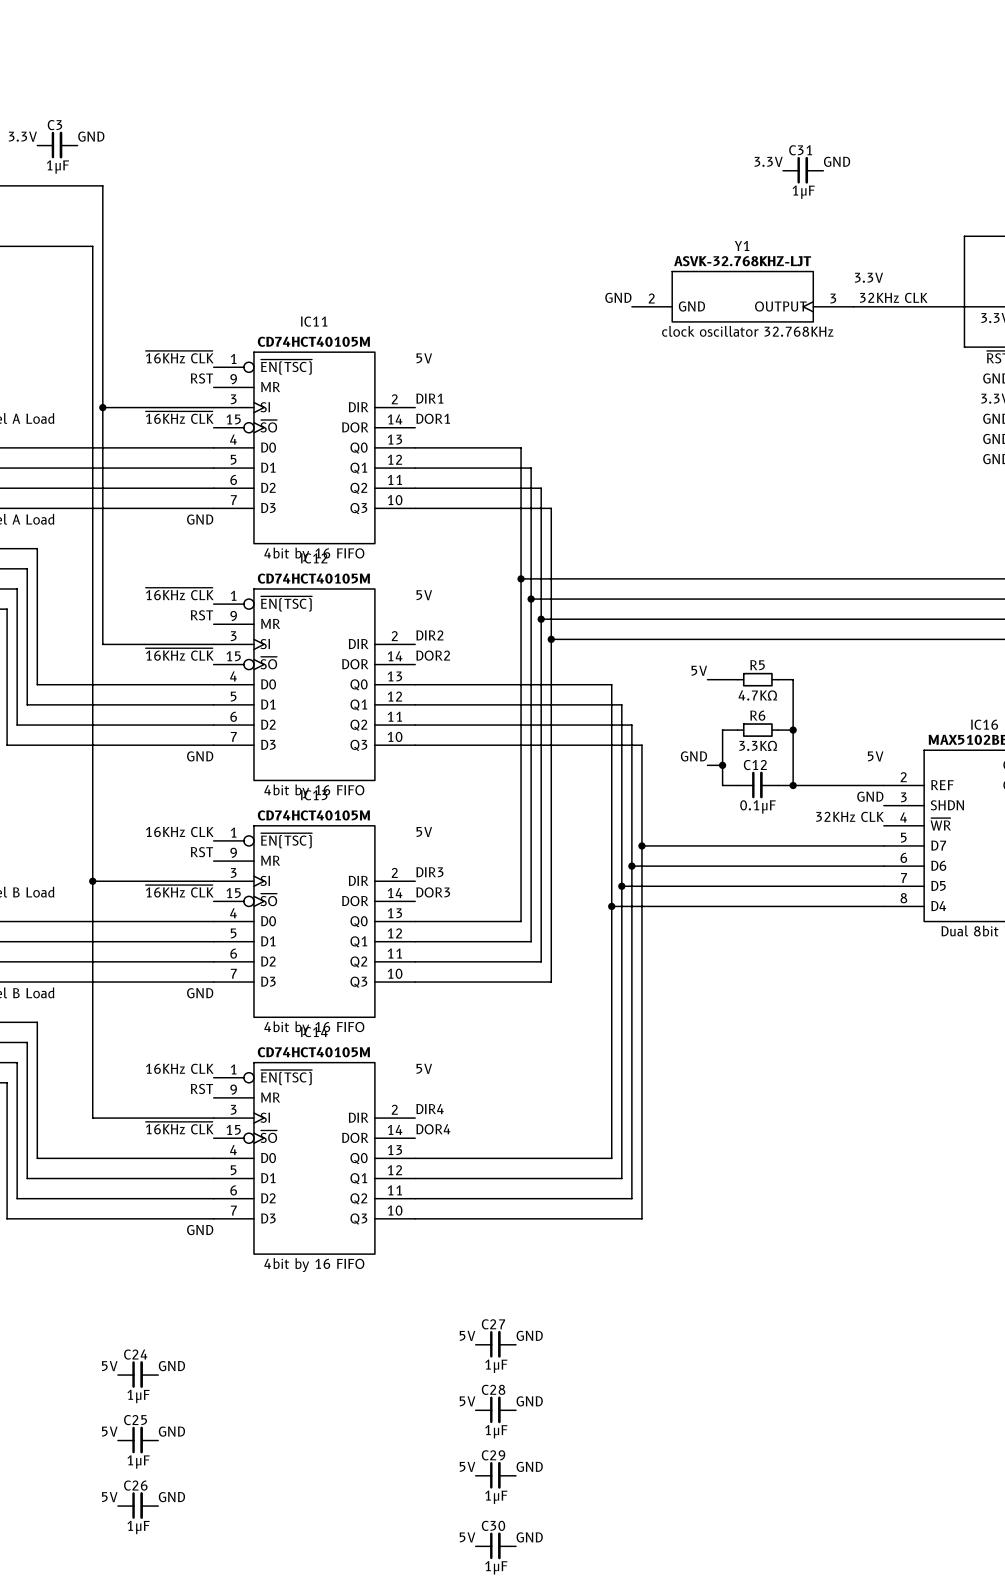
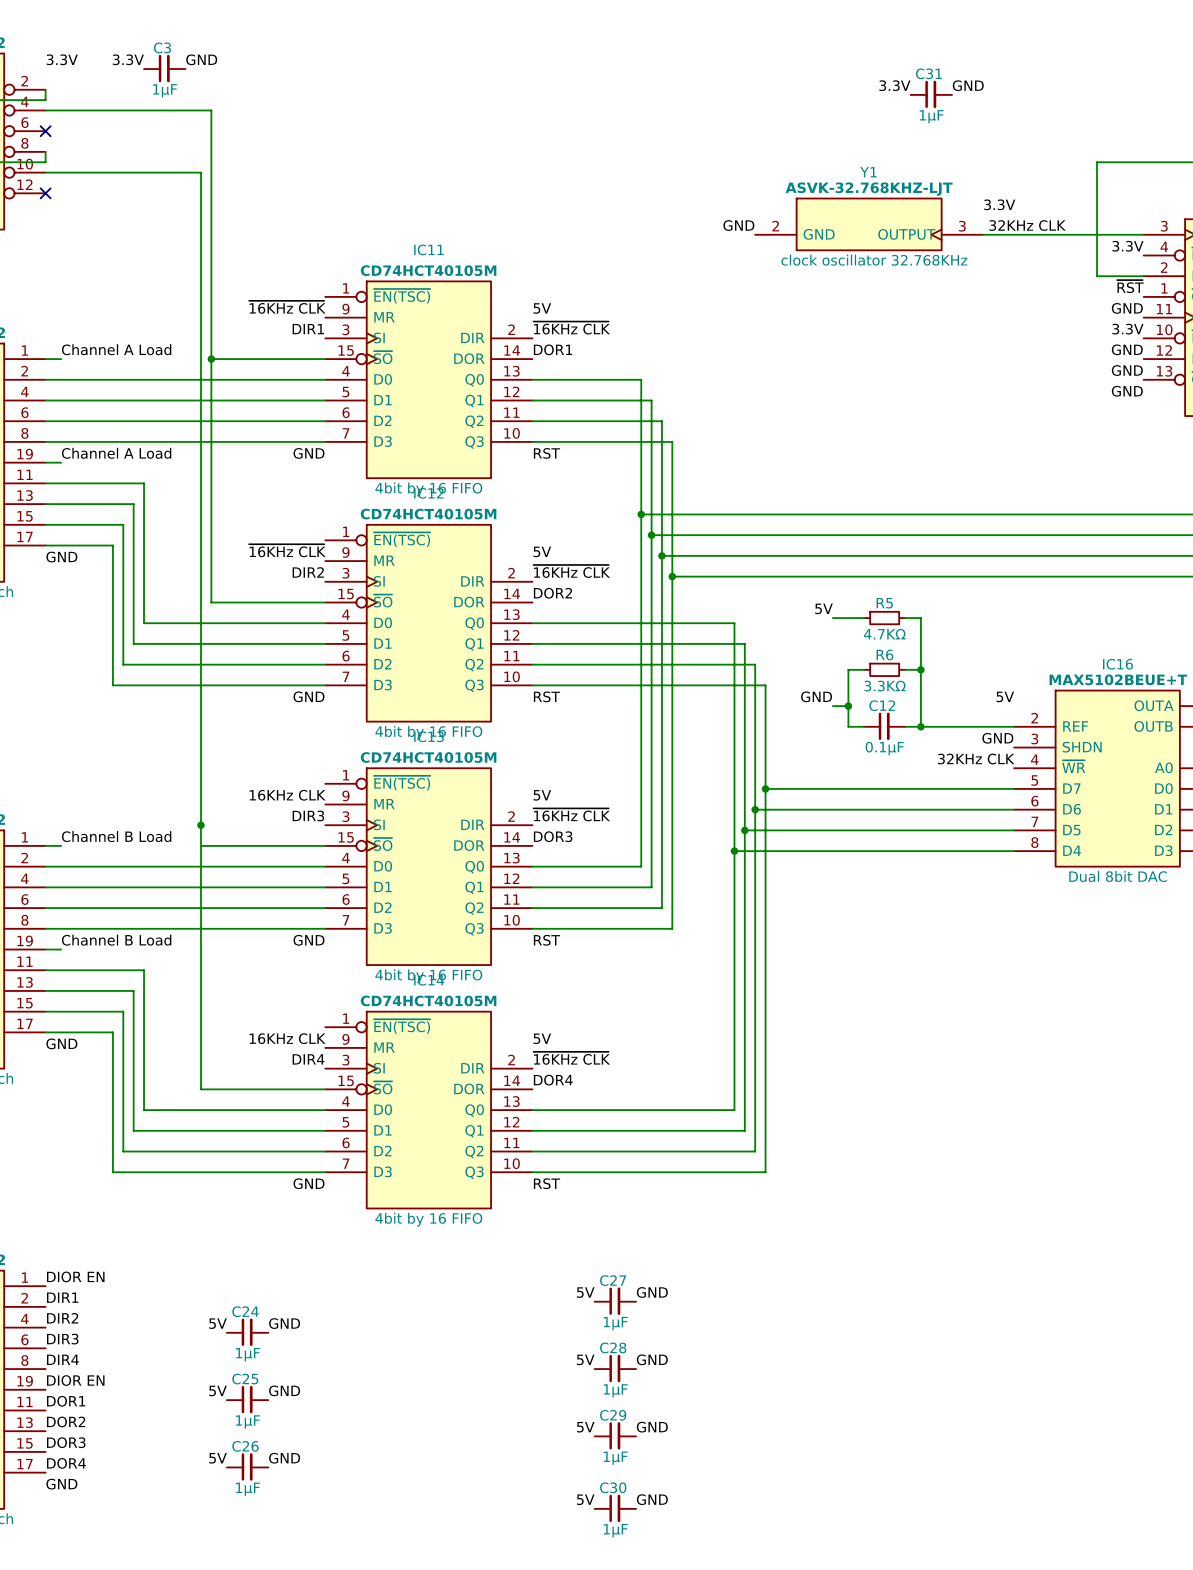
label: ~{16KHz CLK} (179, 357) -> none
label position: 5V (424, 358) -> 5V (542, 308)
label: RST (201, 378) -> ~{16KHz CLK} (287, 307)
label: none -> DIR1 (308, 329)
label: DIR1 (429, 398) -> ~{16KHz CLK} (571, 328)
wire: (102, 407) (213, 407) -> (211, 359) (325, 359)
junction position: (102, 407) -> (211, 359)
label: ~{16KHz CLK} (179, 417) -> none
label: none -> RST (546, 453)
label: ~{16KHz CLK} (179, 594) -> none
label position: 5V (424, 595) -> 5V (542, 551)
label: RST (201, 615) -> ~{16KHz CLK} (287, 550)
label: none -> DIR2 (308, 572)
label: DIR2 (429, 635) -> ~{16KHz CLK} (571, 571)
wire: (102, 644) (213, 644) -> (211, 581) (211, 602) (325, 602)
label: ~{16KHz CLK} (179, 654) -> none
label: none -> RST (546, 696)
label: 16KHz CLK (179, 831) -> none
label position: 5V (424, 832) -> 5V (542, 795)
label: RST (201, 852) -> 16KHz CLK (287, 795)
label: none -> DIR3 (308, 815)
label: DIR3 (429, 872) -> ~{16KHz CLK} (571, 814)
wire: (92, 881) (213, 881) -> (200, 845) (325, 845)
label: ~{16KHz CLK} (179, 891) -> none
label: none -> RST (546, 940)
label: 16KHz CLK (179, 1068) -> none
label position: 5V (424, 1068) -> 5V (542, 1038)
label: RST (201, 1088) -> 16KHz CLK (287, 1038)
label: none -> DIR4 (308, 1059)
label: DIR4 (430, 1109) -> ~{16KHz CLK} (571, 1058)
wire: (92, 1118) (213, 1118) -> (200, 1068) (200, 1089) (325, 1089)
label: ~{16KHz CLK} (179, 1128) -> none
label: none -> RST (546, 1183)

